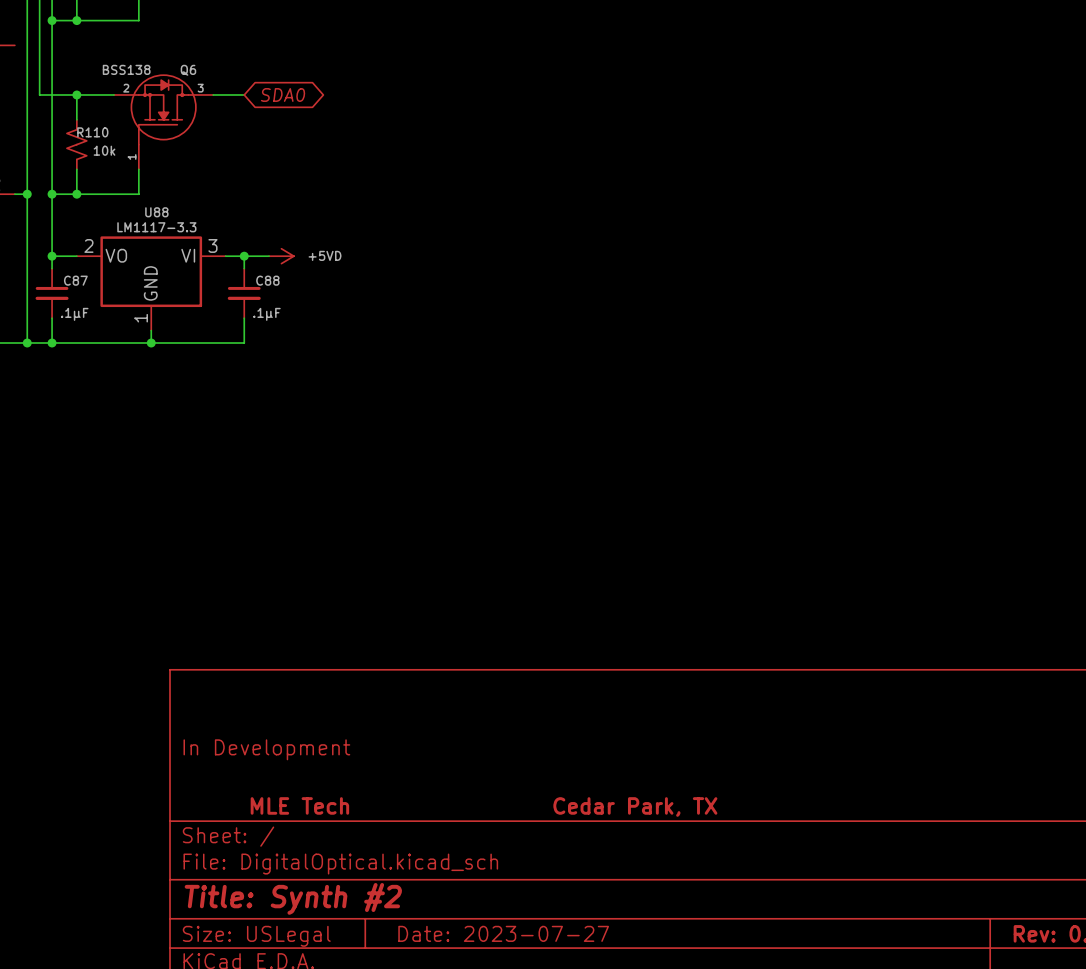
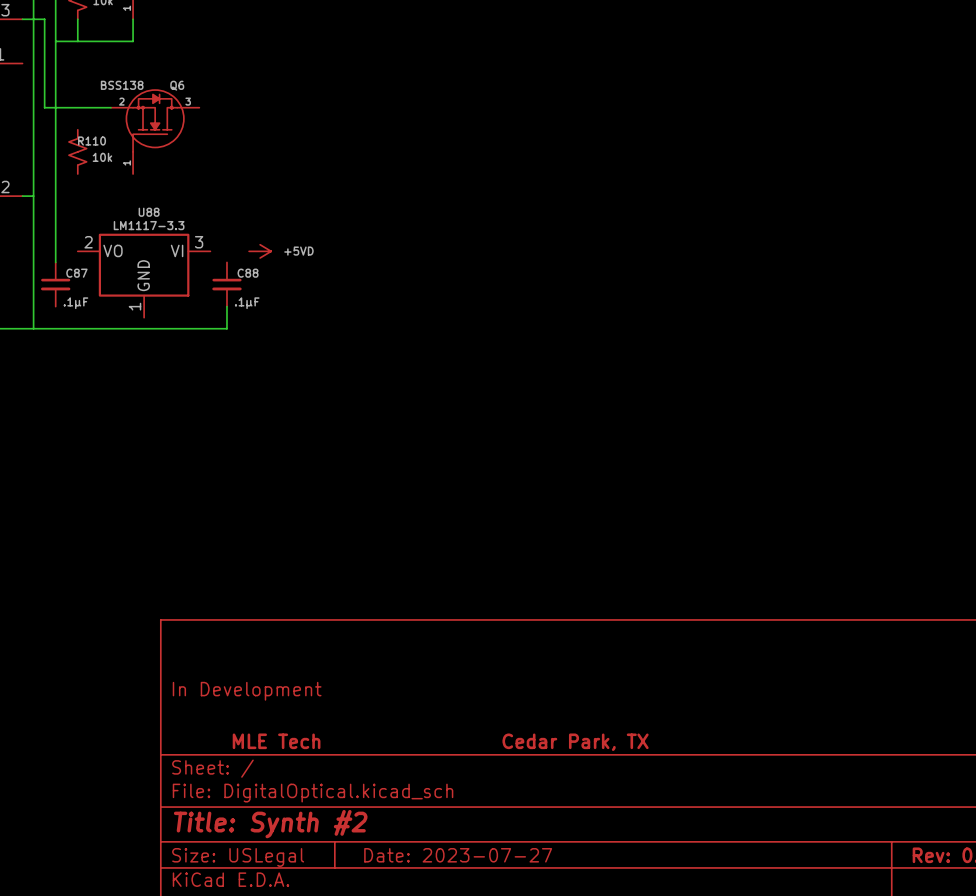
junction: (52, 20) -> none
junction: (76, 20) -> none
wire: (76, 94) (76, 119) -> none
junction: (76, 94) -> none
wire: (213, 94) (244, 94) -> none
global label: SDA0 (283, 94) -> none
wire: (76, 169) (76, 194) -> none
wire: (138, 169) (138, 194) (52, 194) -> none
junction: (27, 194) -> none
junction: (52, 194) -> none
junction: (76, 194) -> none
wire: (52, 256) (76, 256) -> none
junction: (52, 256) -> none
wire: (225, 256) (269, 256) -> none
wire: (244, 256) (244, 268) -> none
junction: (244, 256) -> none
wire: (52, 318) (52, 343) -> none
wire: (151, 330) (151, 343) -> none
junction: (27, 343) -> none
junction: (52, 343) -> none
junction: (151, 343) -> none

